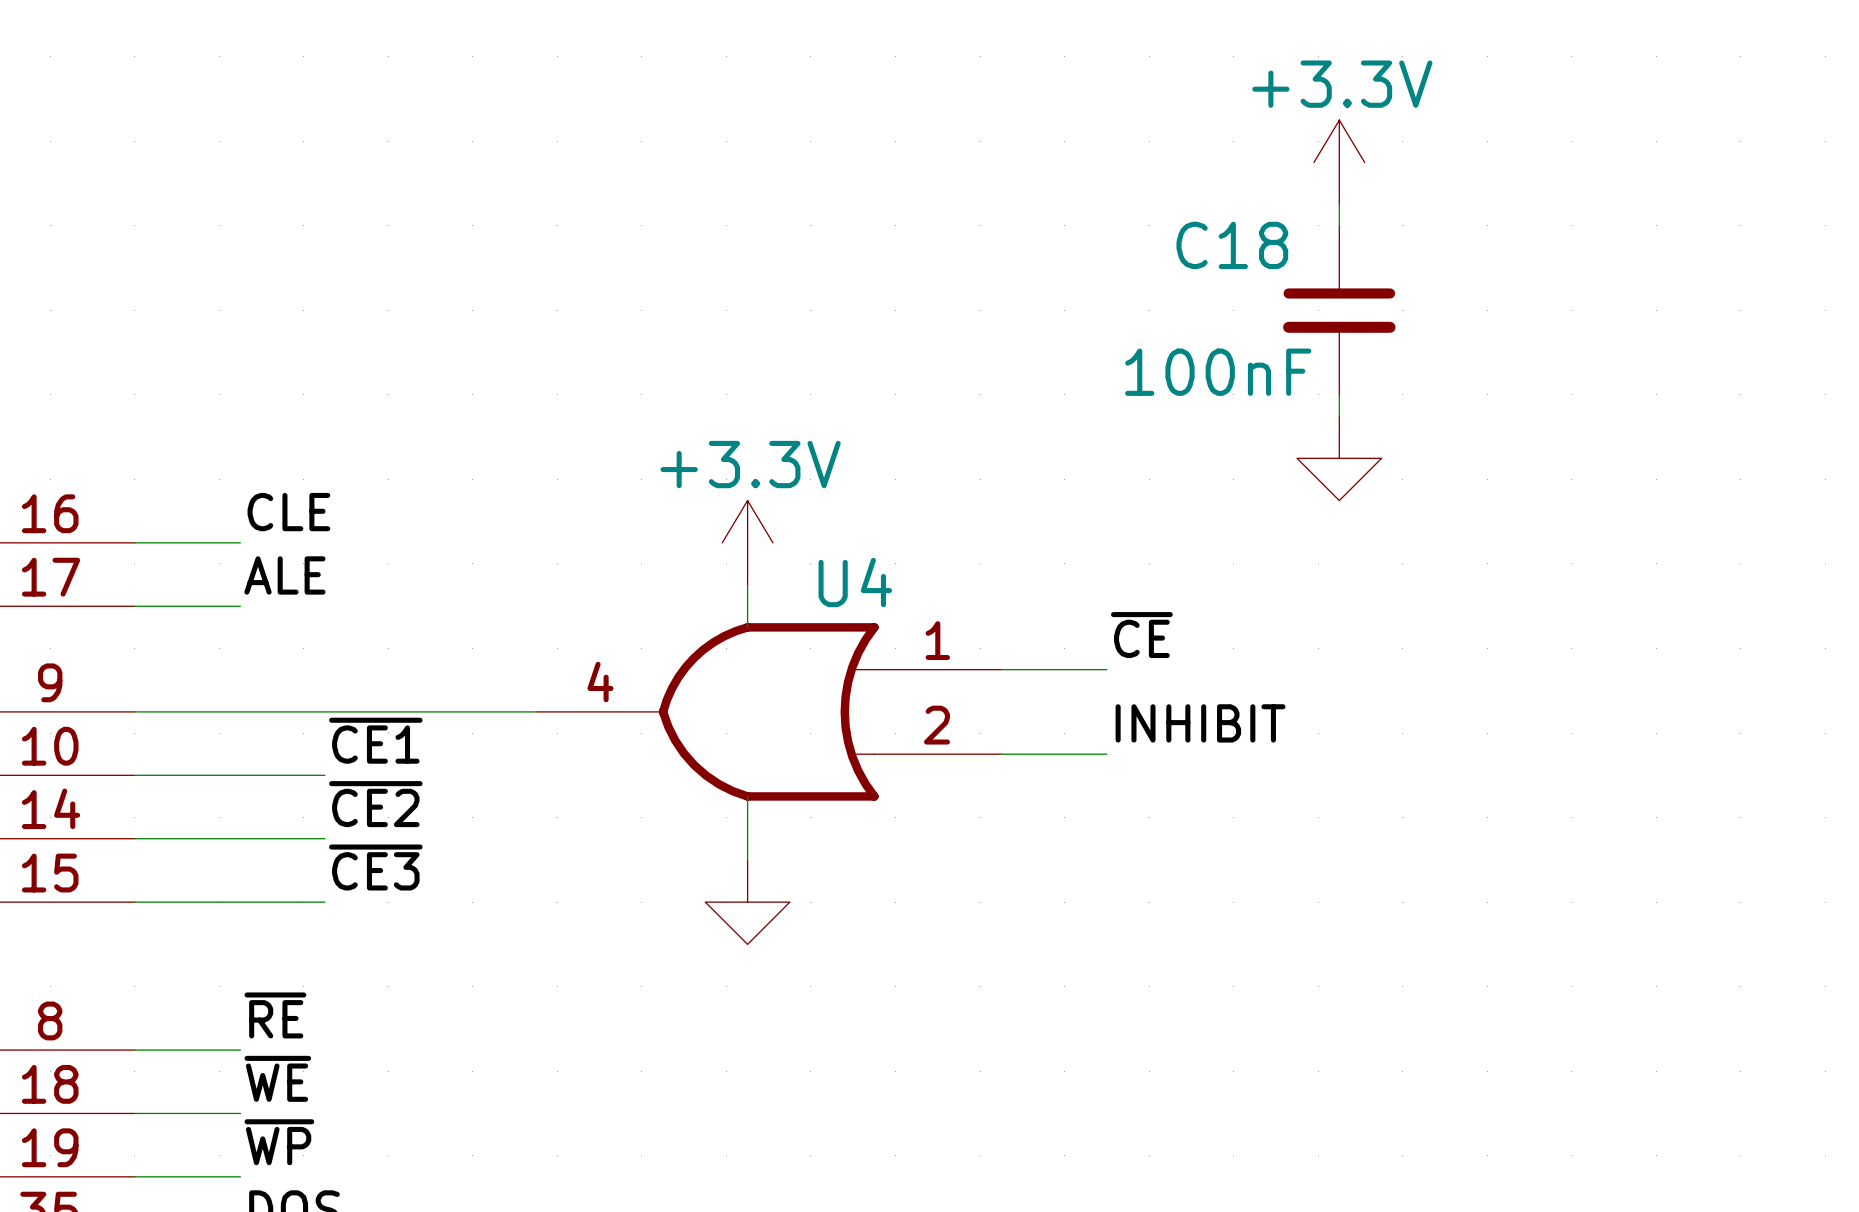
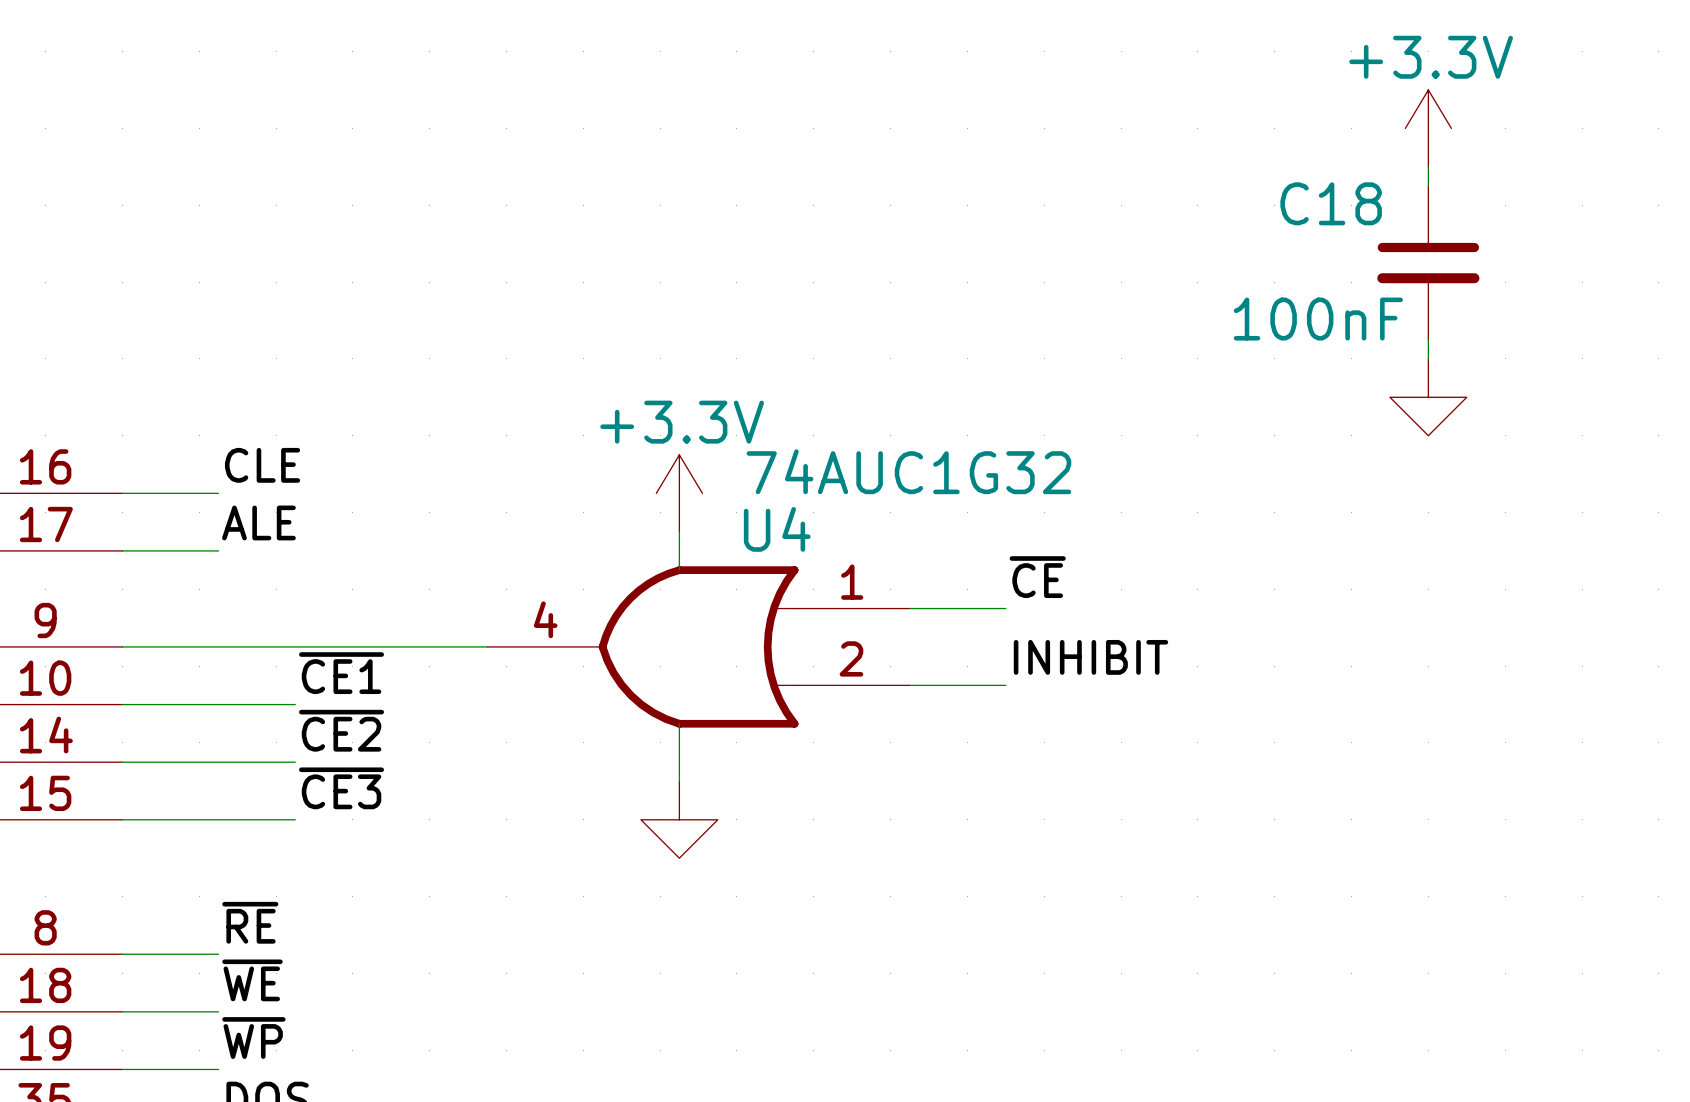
power symbol position: +3.3V (1339, 162) -> +3.3V (1428, 128)
wire: (1339, 204) (1339, 225) -> (1428, 166) (1428, 186)
C18 position: (1339, 310) -> (1428, 262)
wire: (1339, 394) (1339, 416) -> (1428, 339) (1428, 358)
power symbol position: (1339, 458) -> (1428, 397)
U4 value: none -> 74AUC1G32 (908, 471)

